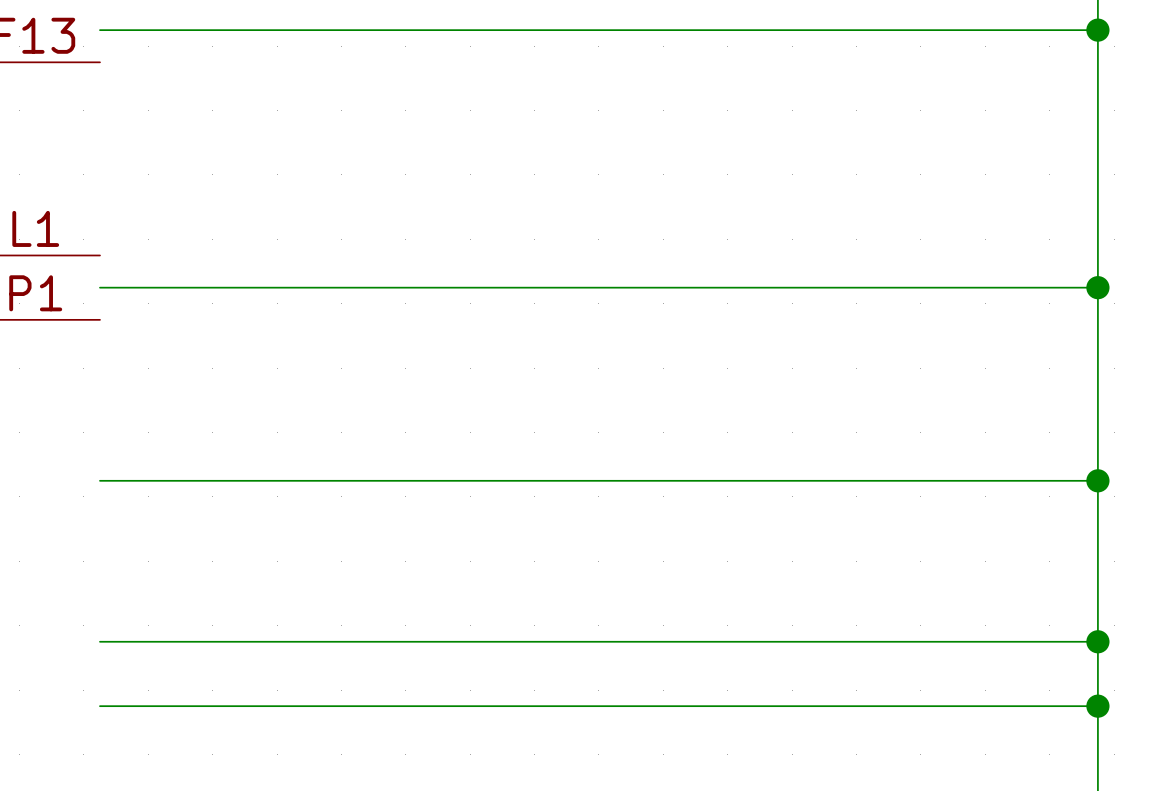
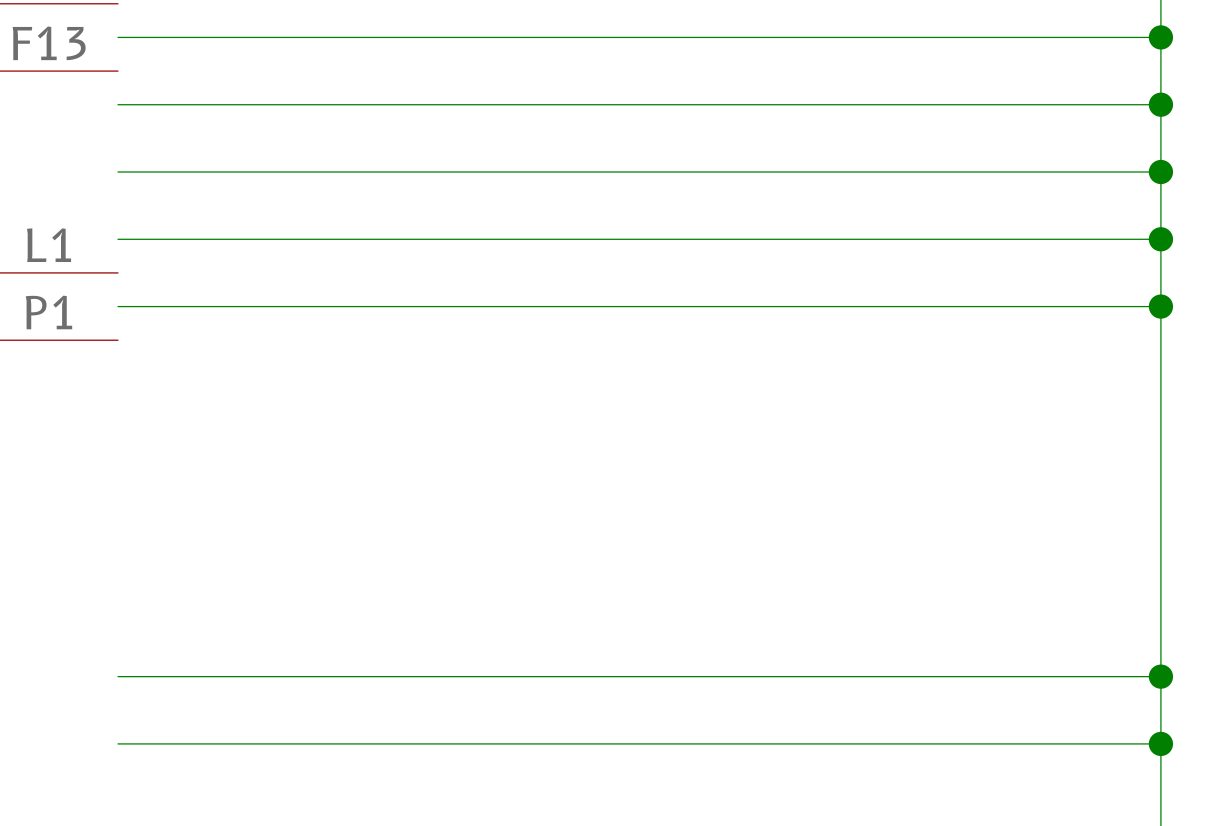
wire: none -> (118, 104) (1160, 104)
junction: none -> (1160, 104)
wire: none -> (118, 172) (1160, 172)
junction: none -> (1160, 172)
junction: none -> (1160, 239)
wire: (99, 480) (1097, 480) -> (118, 239) (1160, 239)
junction: (1097, 480) -> none

